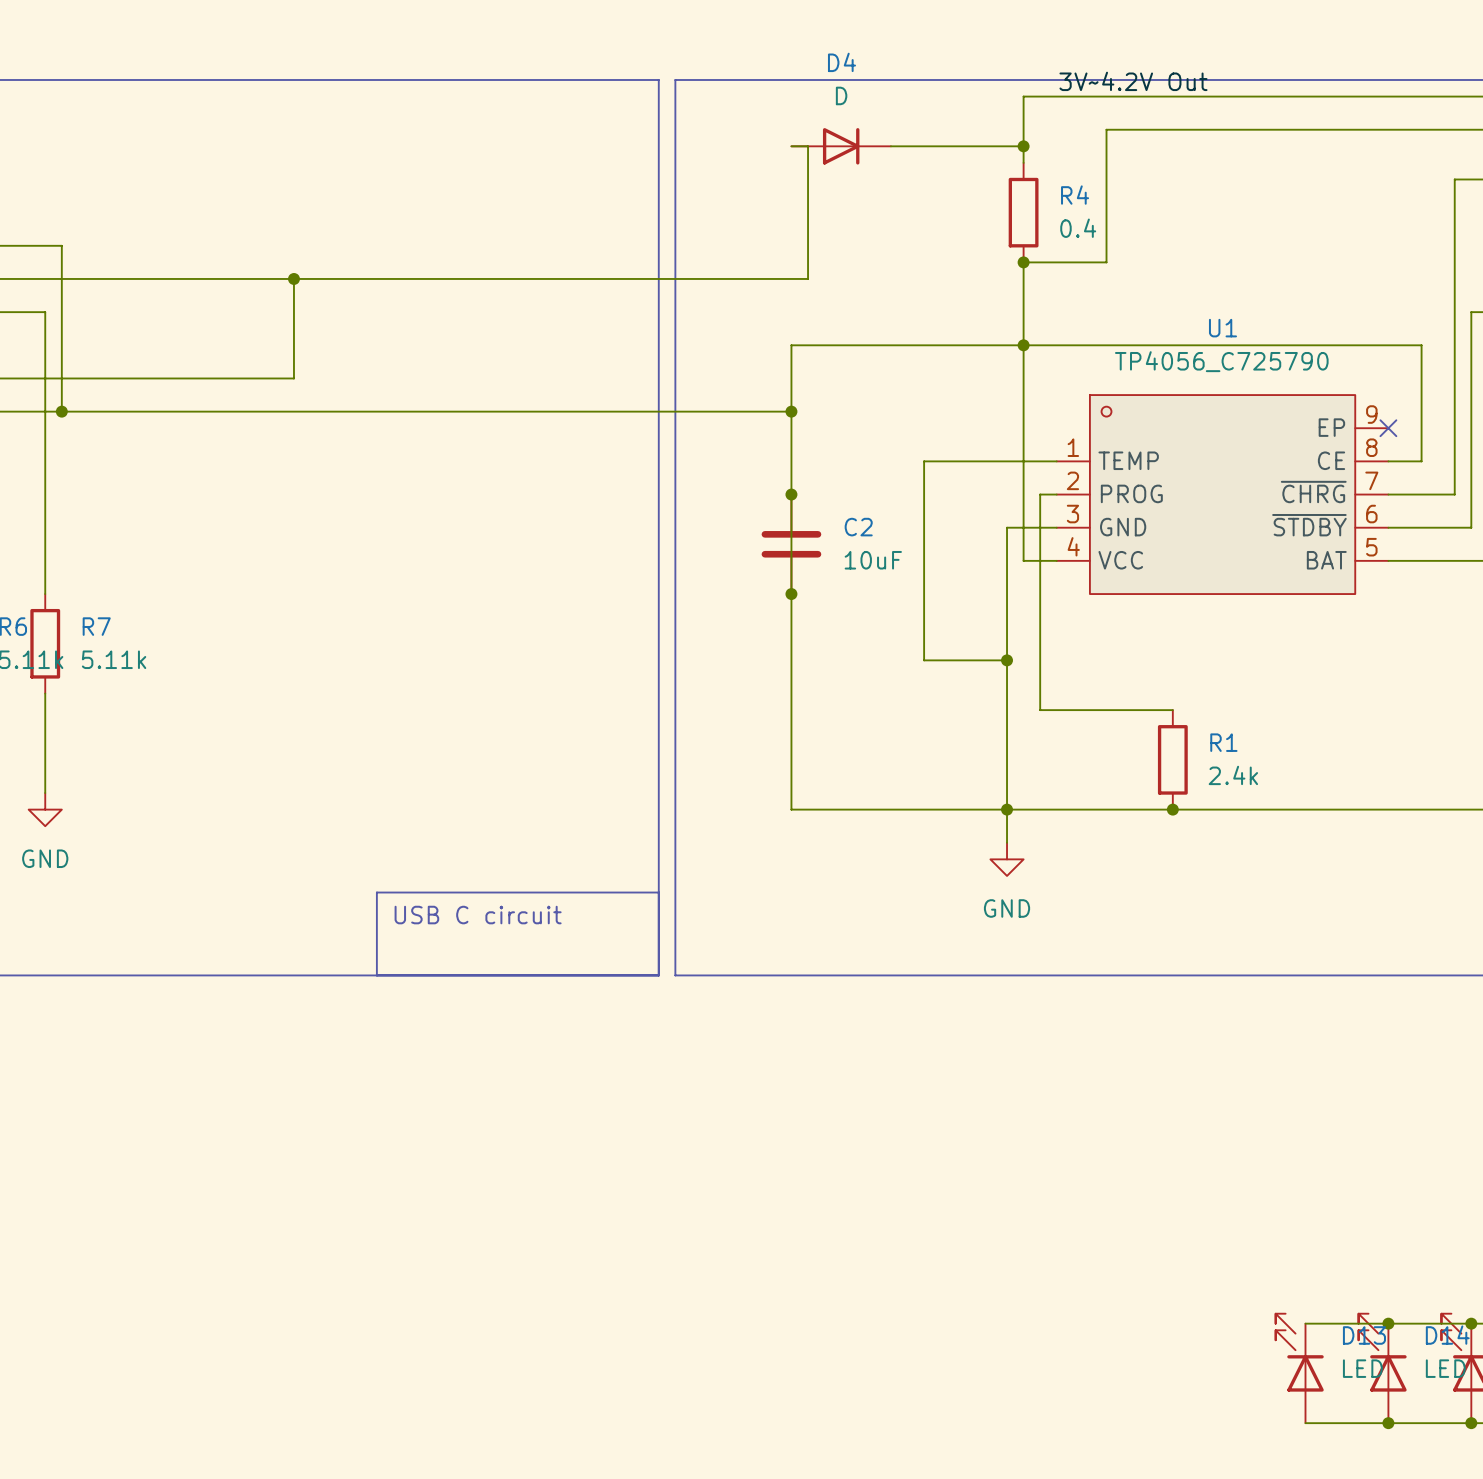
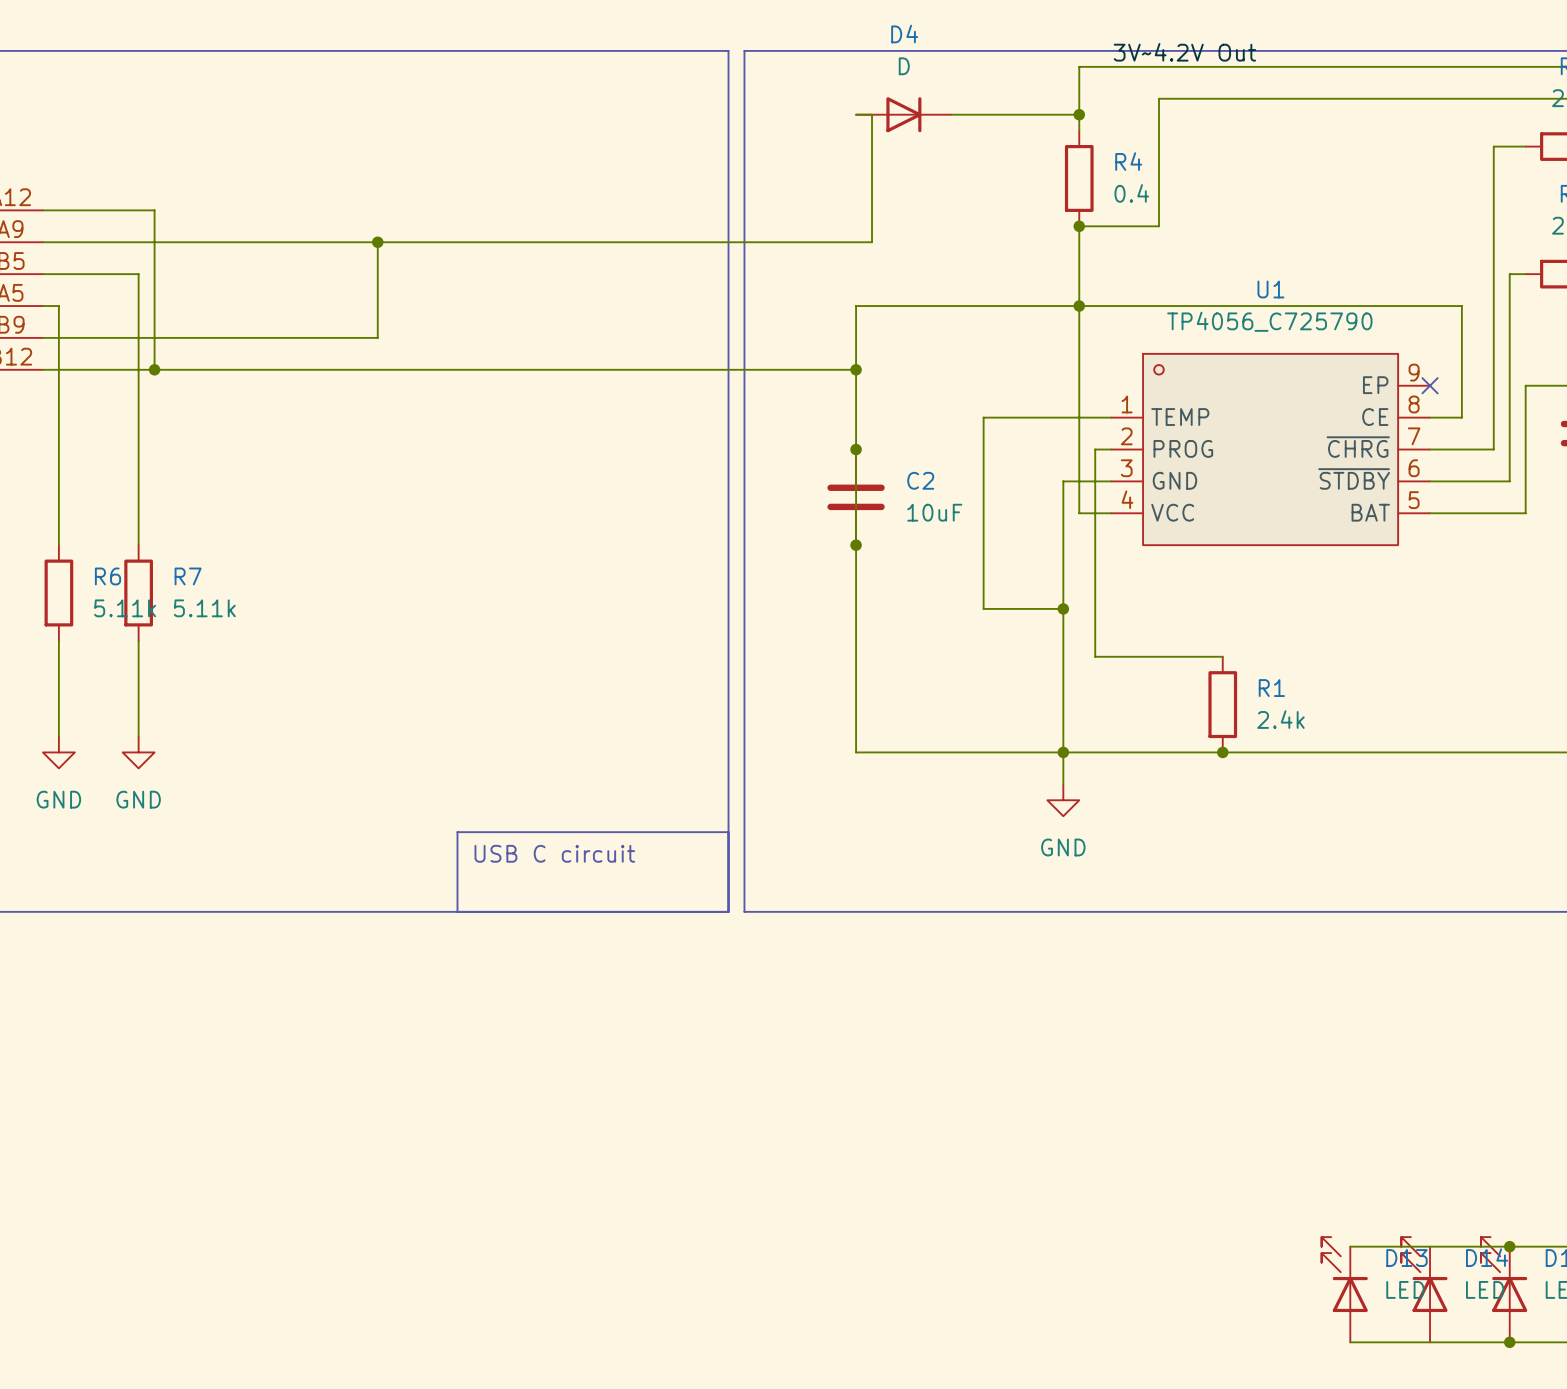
junction: (1388, 1323) -> none
junction: (1388, 1423) -> none

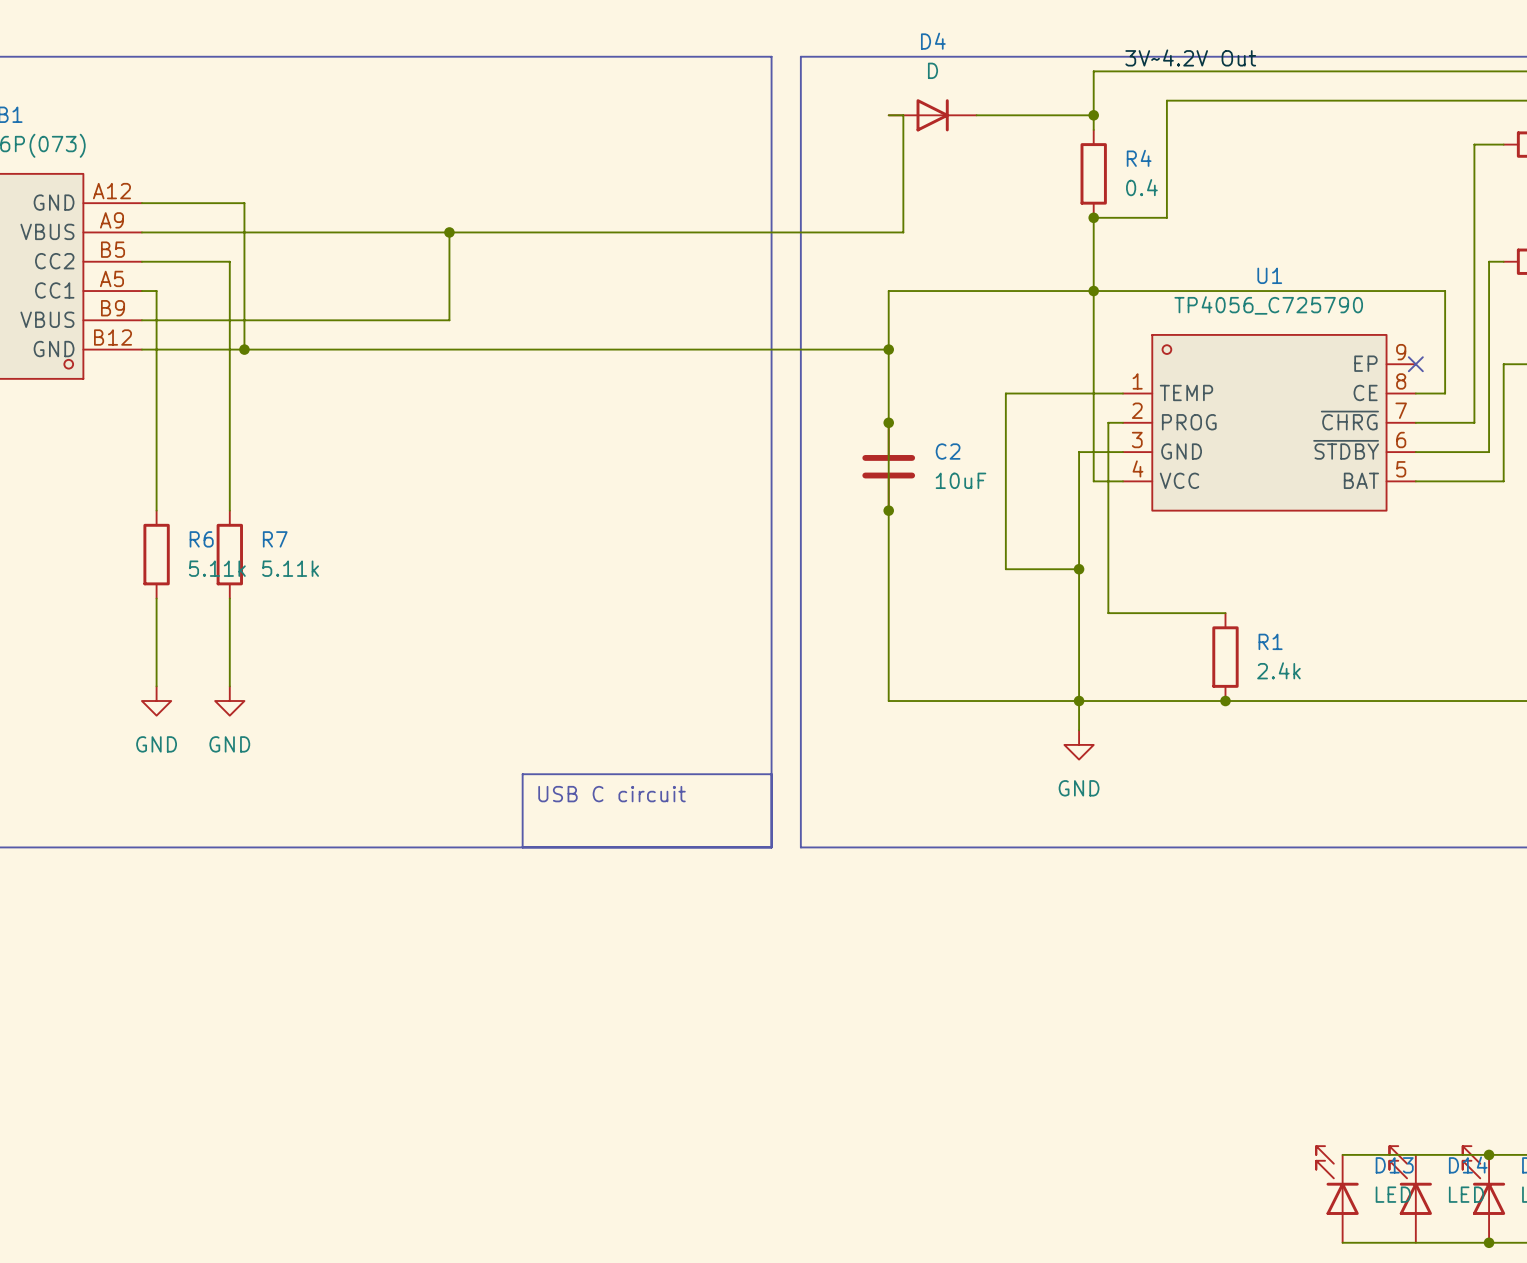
line: (760, 50) (744, 50) (744, 911) (760, 911) -> (800, 56) (800, 847)

